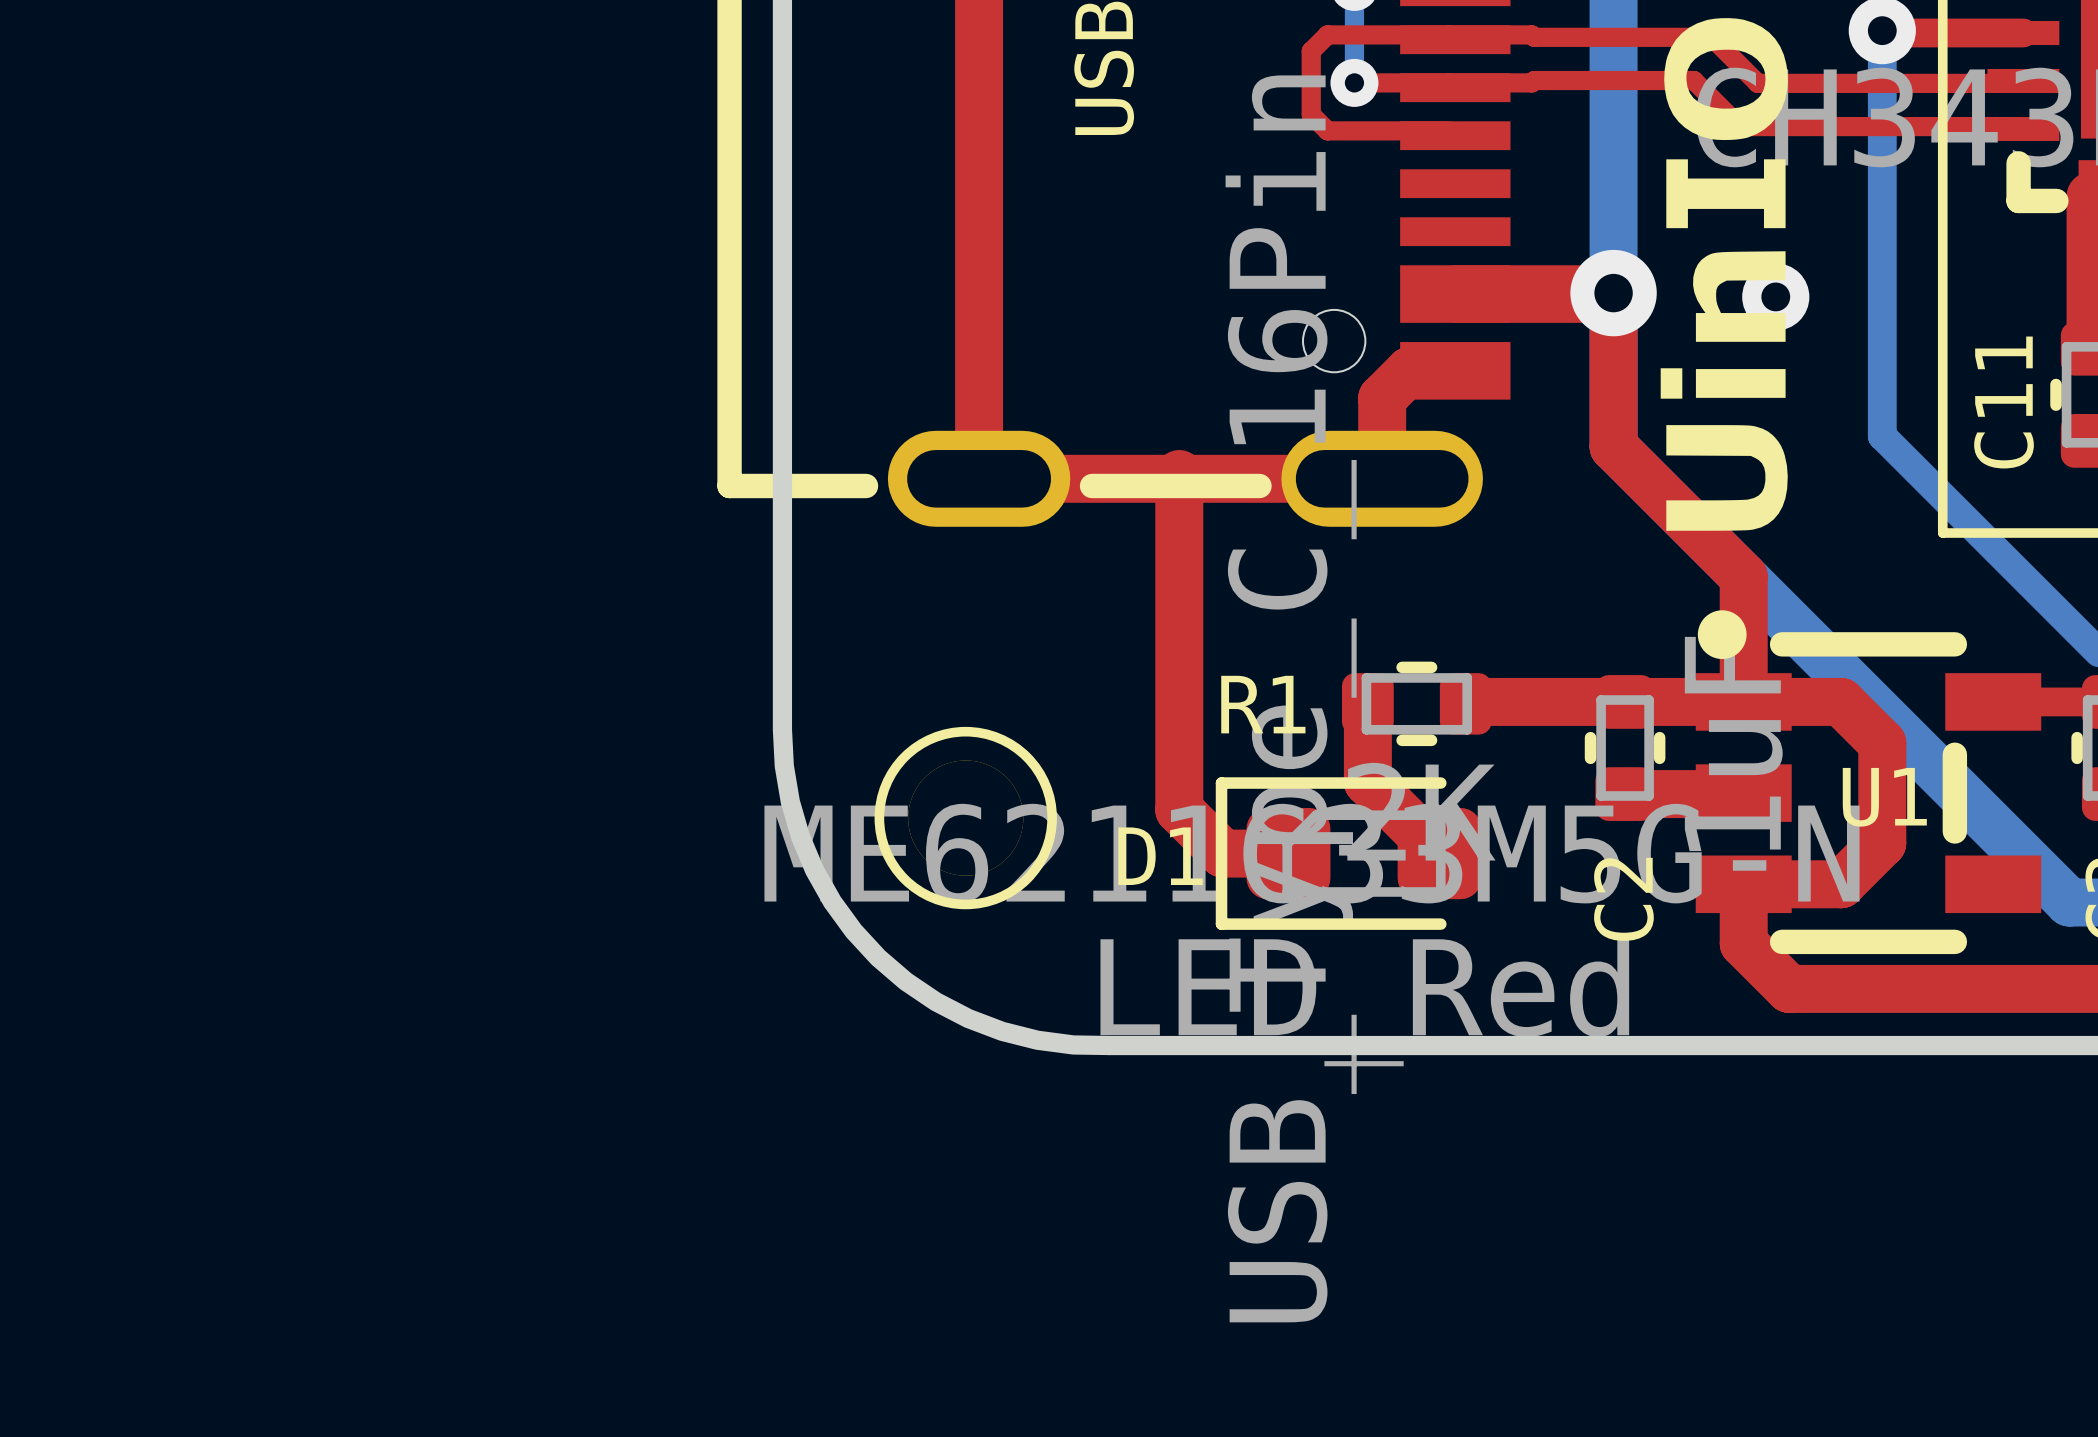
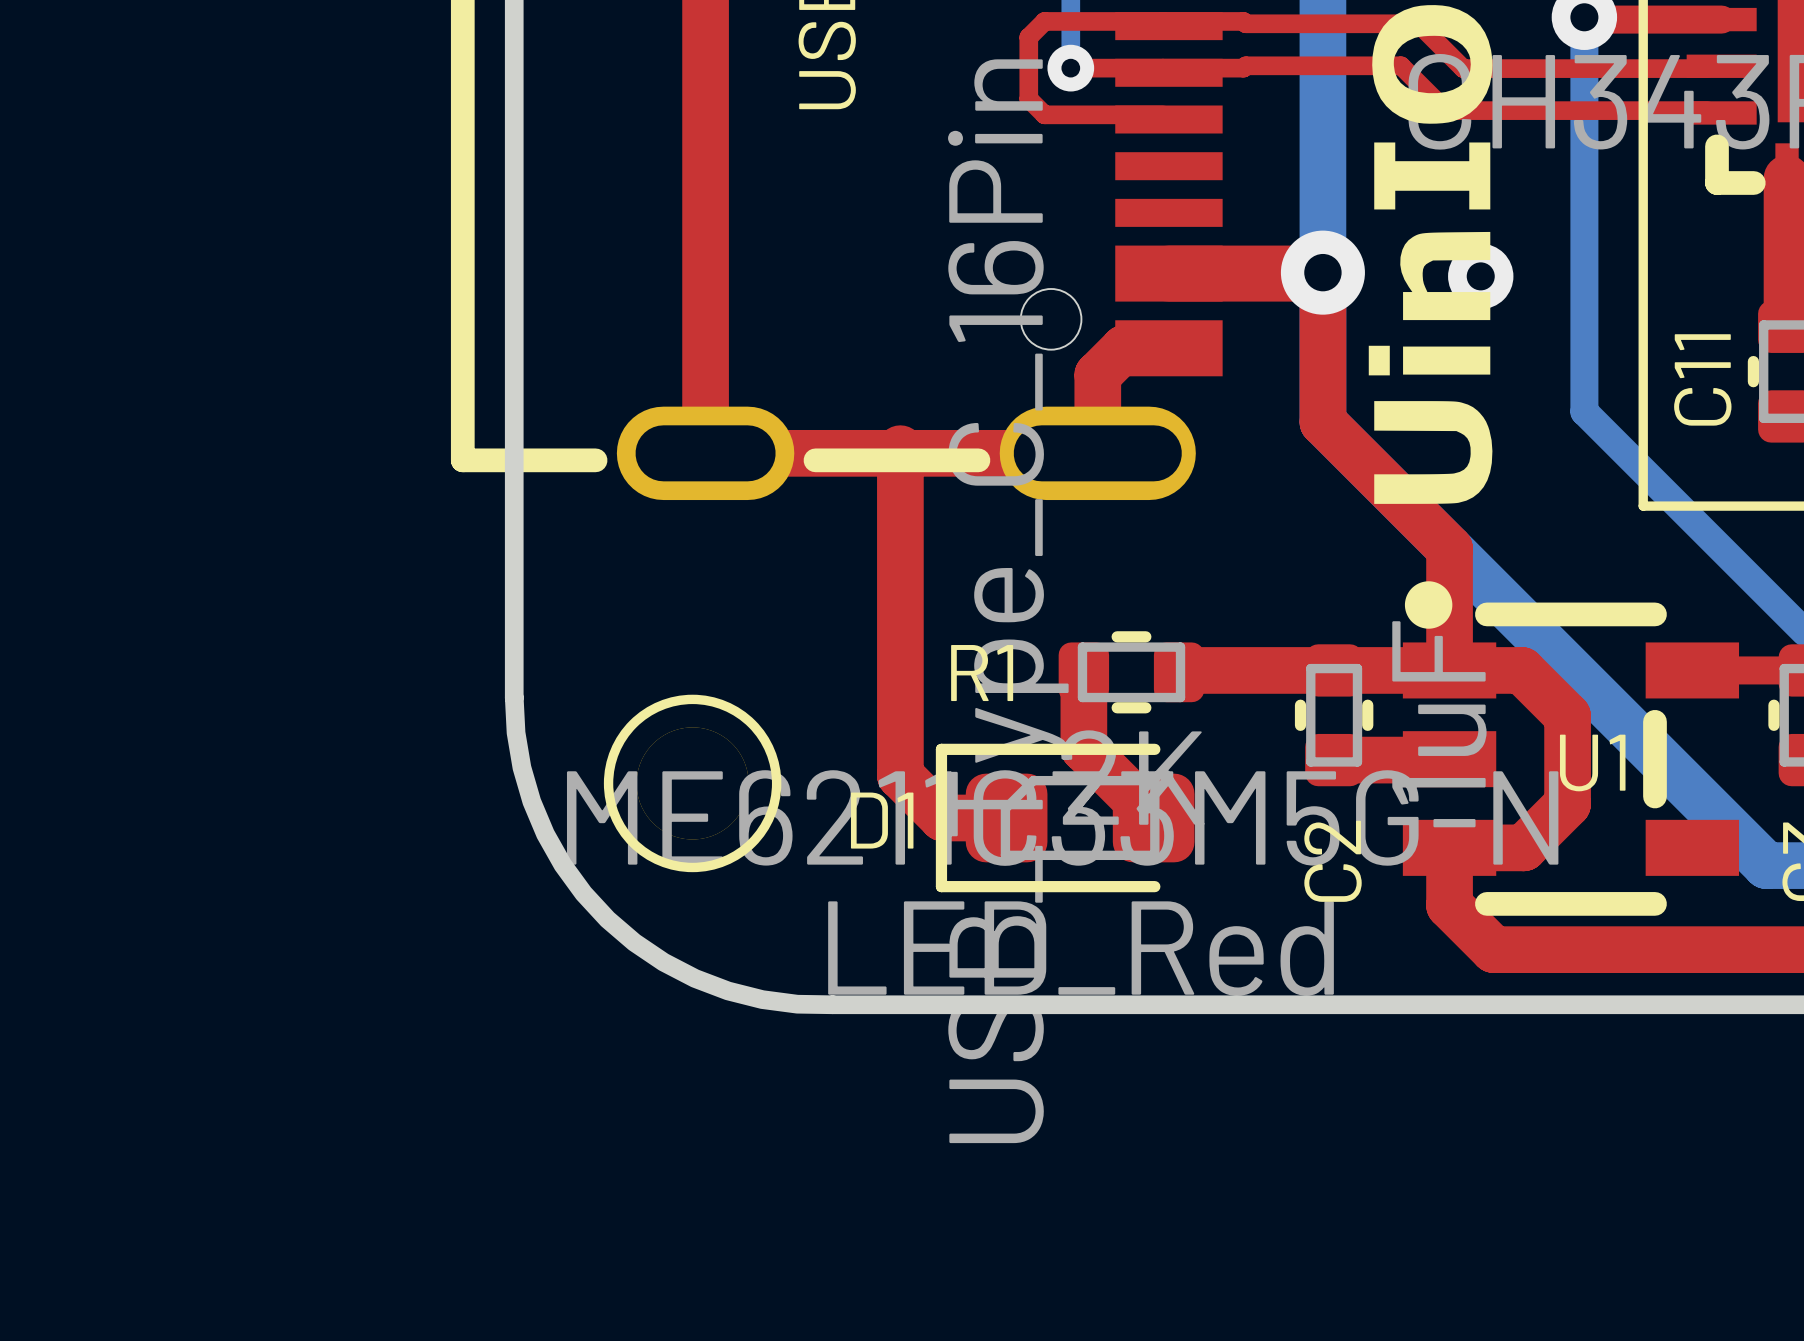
top track: (1818, 701) (1841, 701) (1882, 743) (1882, 843) (1841, 884) (1819, 884) -> (1521, 670) (1567, 716) (1567, 803) (1523, 847)

